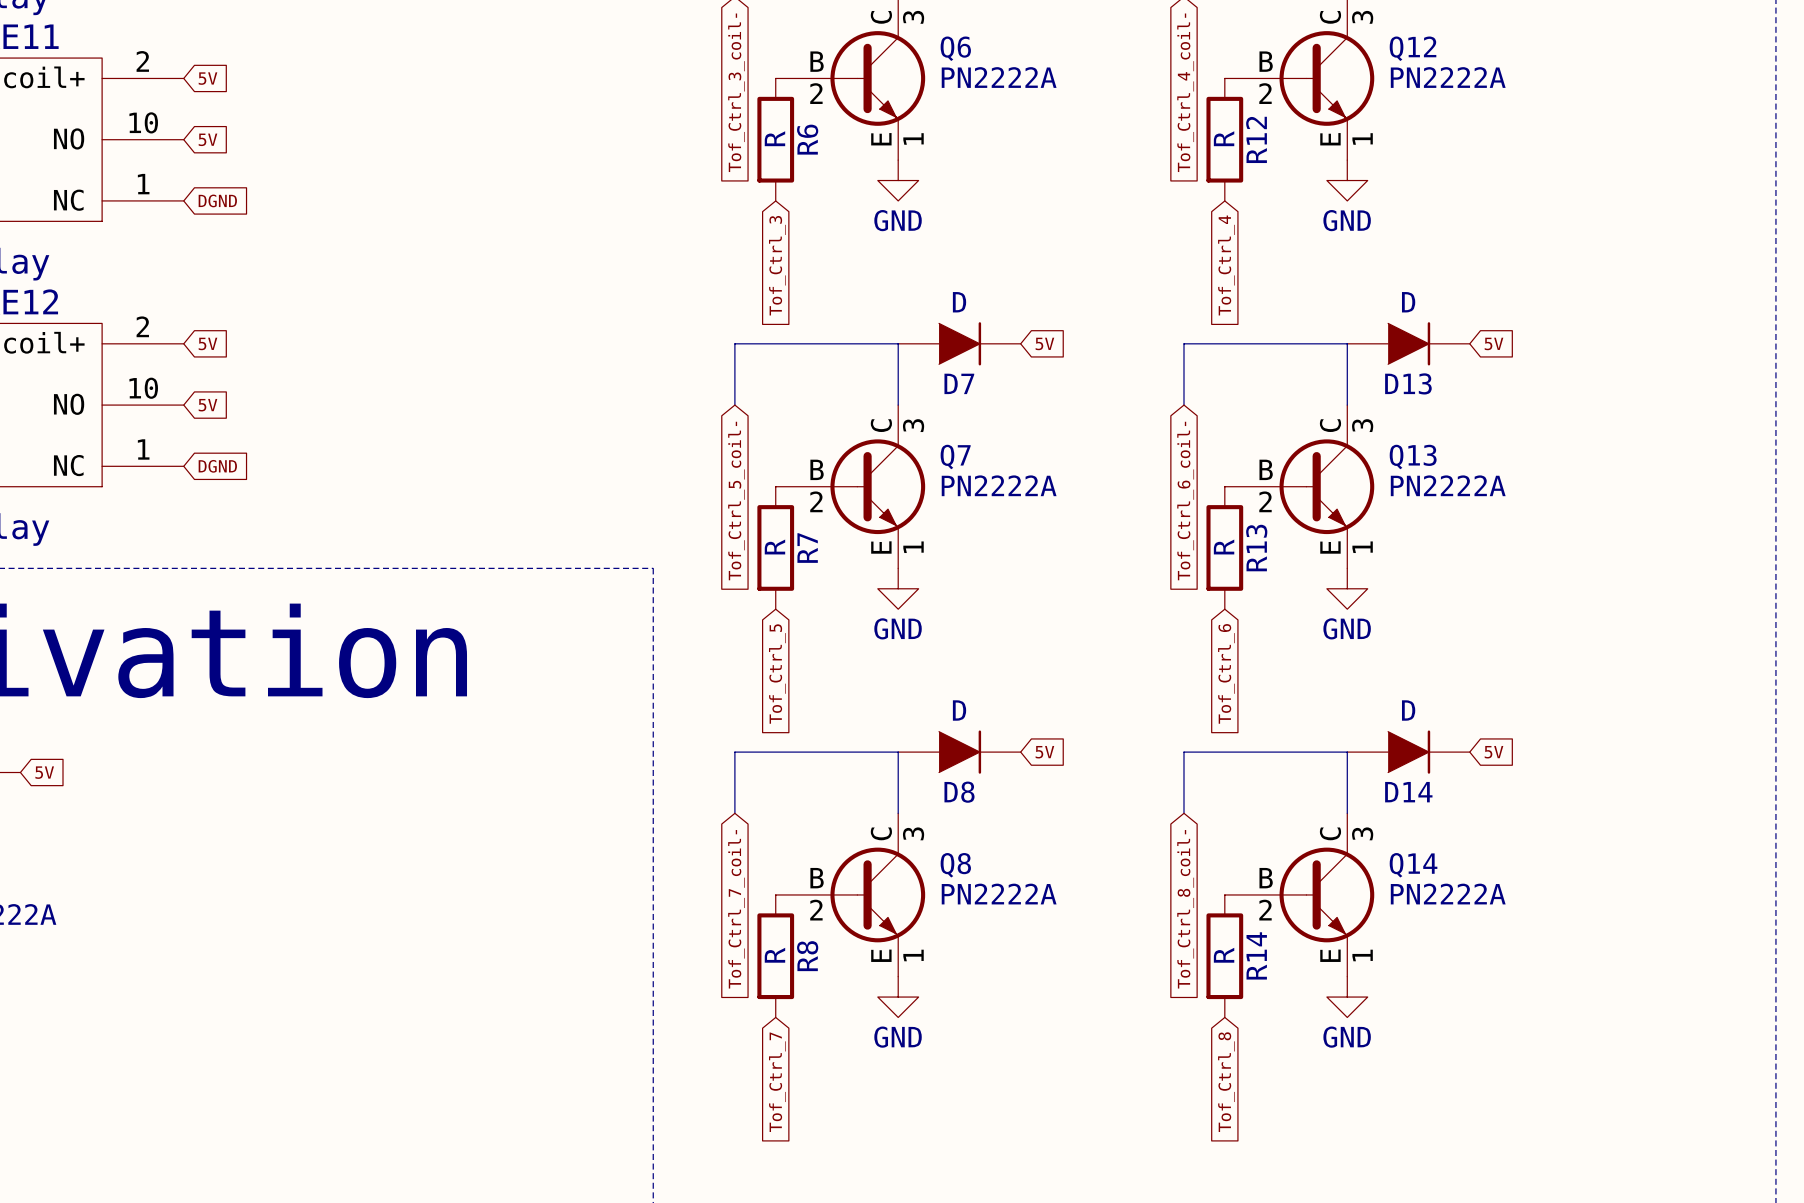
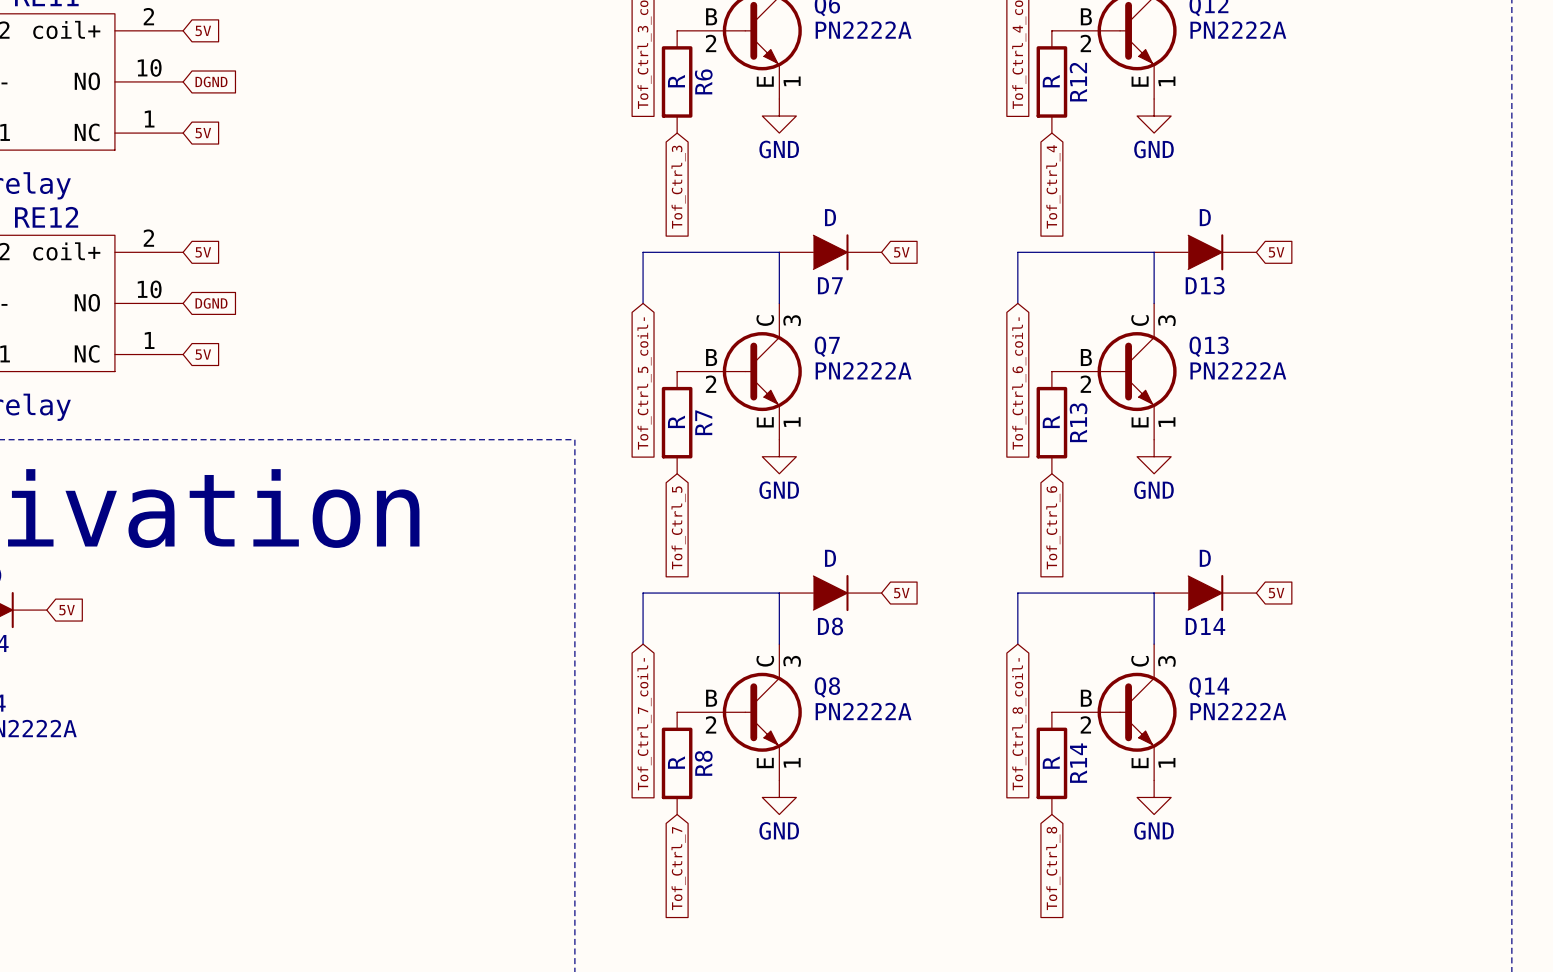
global label: 5V (208, 139) -> DGND (211, 81)
global label: DGND (217, 200) -> 5V (203, 133)
global label: 5V (208, 405) -> DGND (211, 303)
global label: DGND (217, 466) -> 5V (203, 354)

